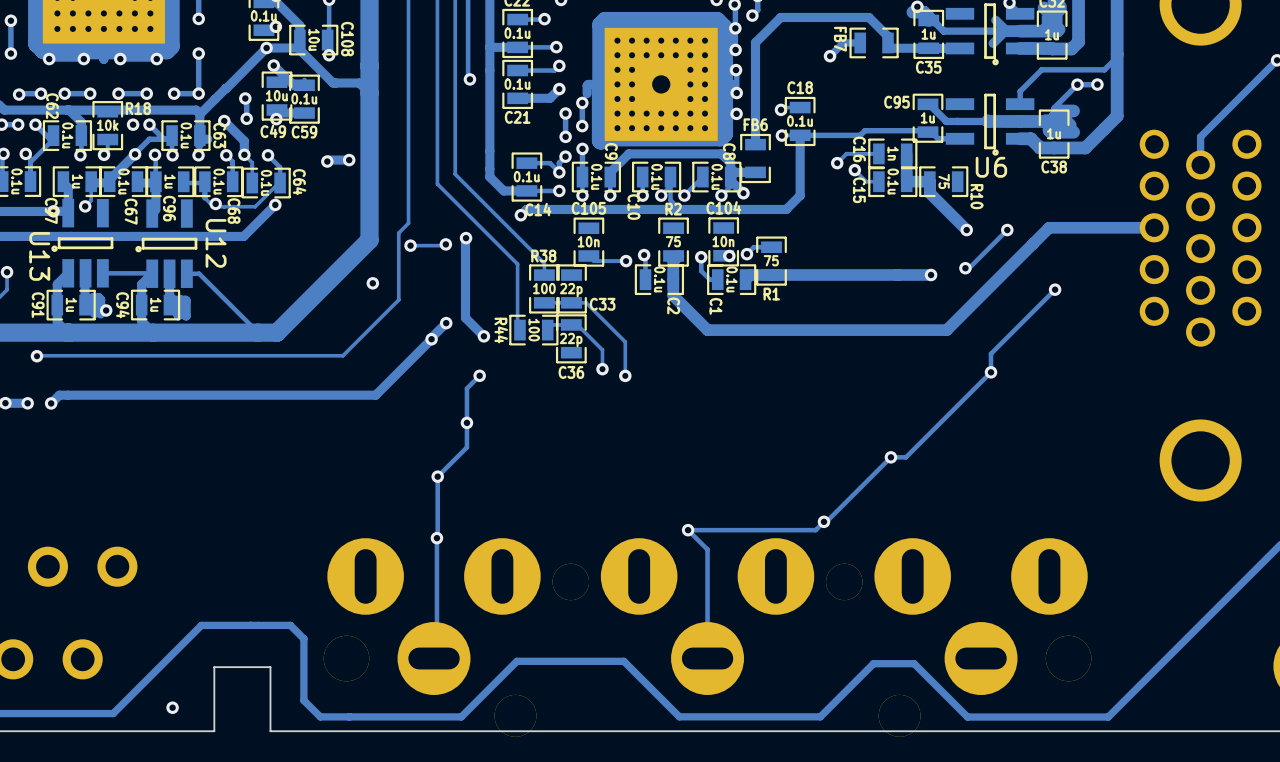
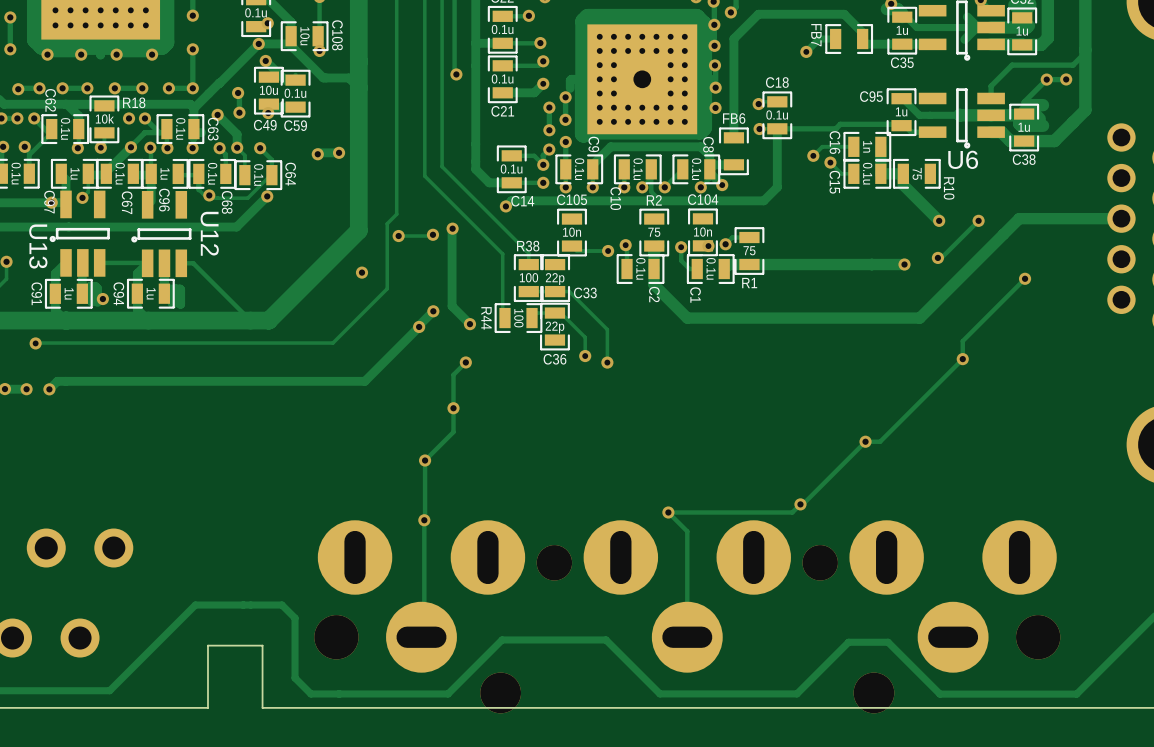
via: (172, 707) -> none

